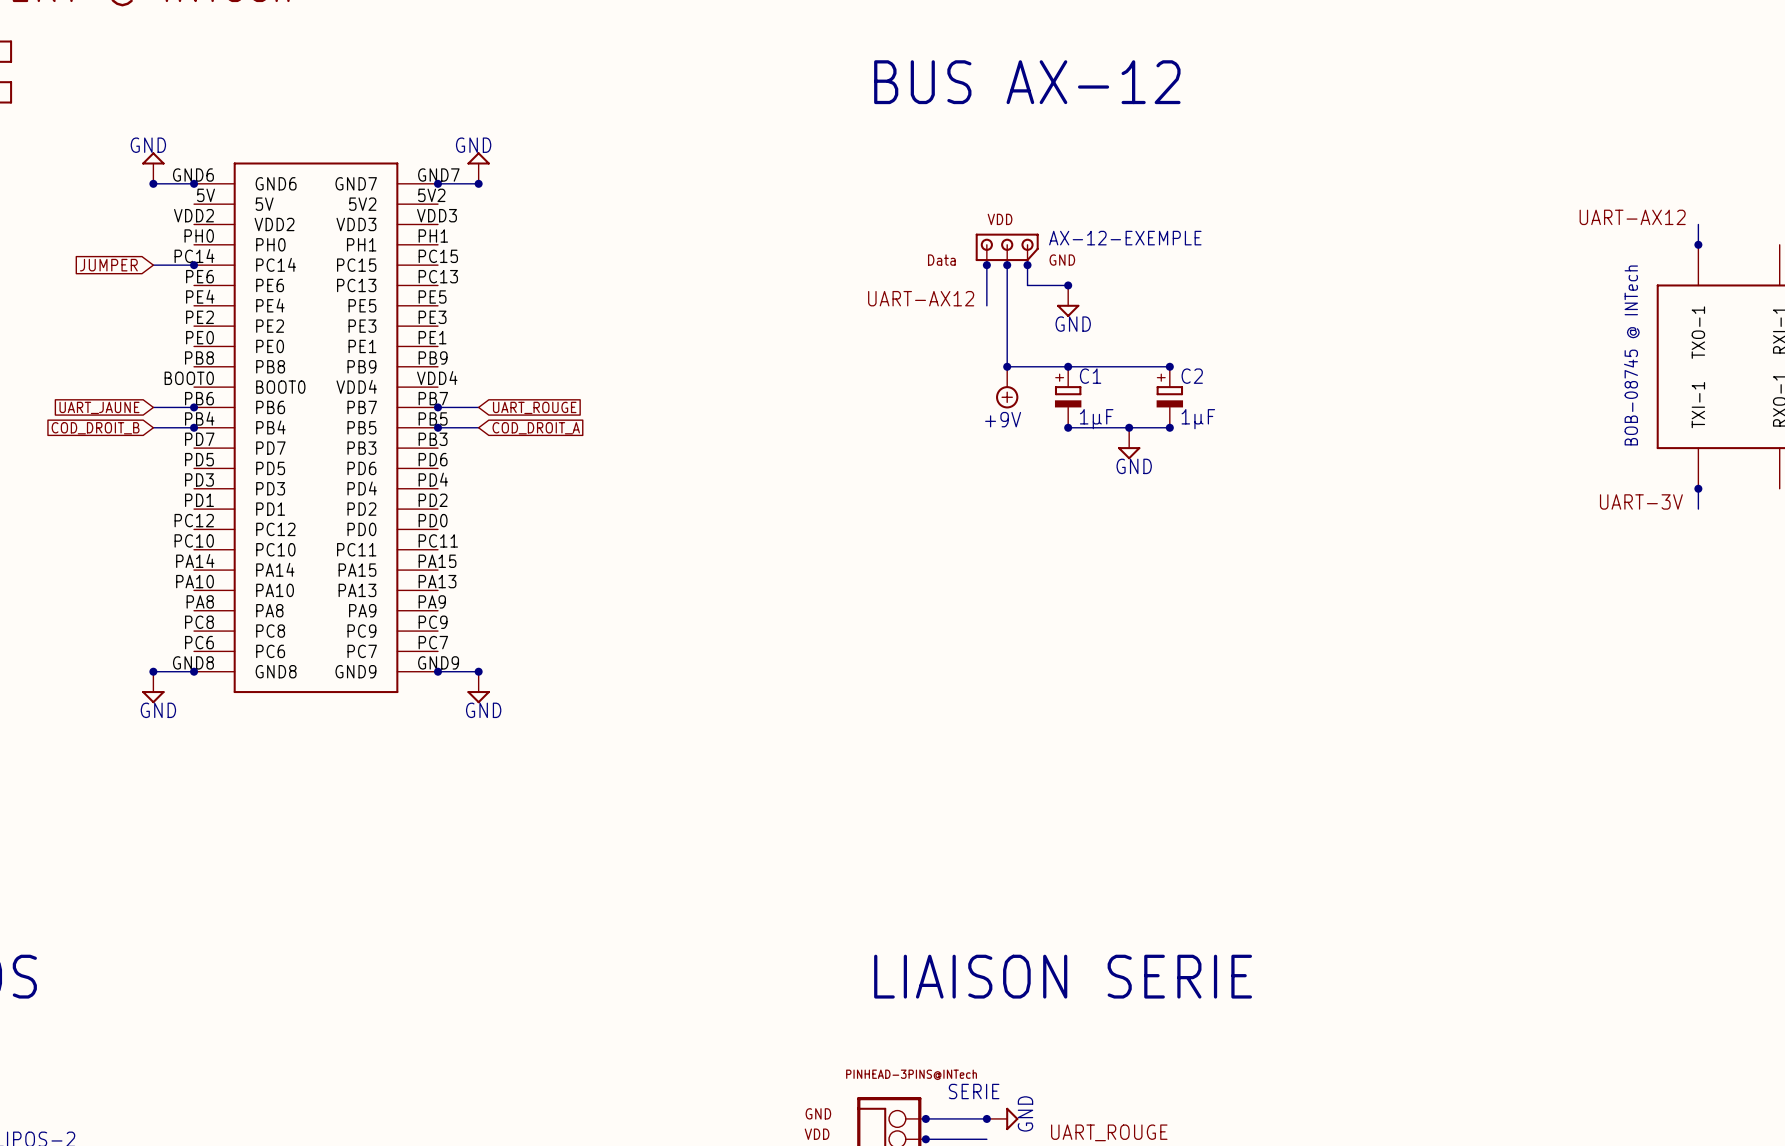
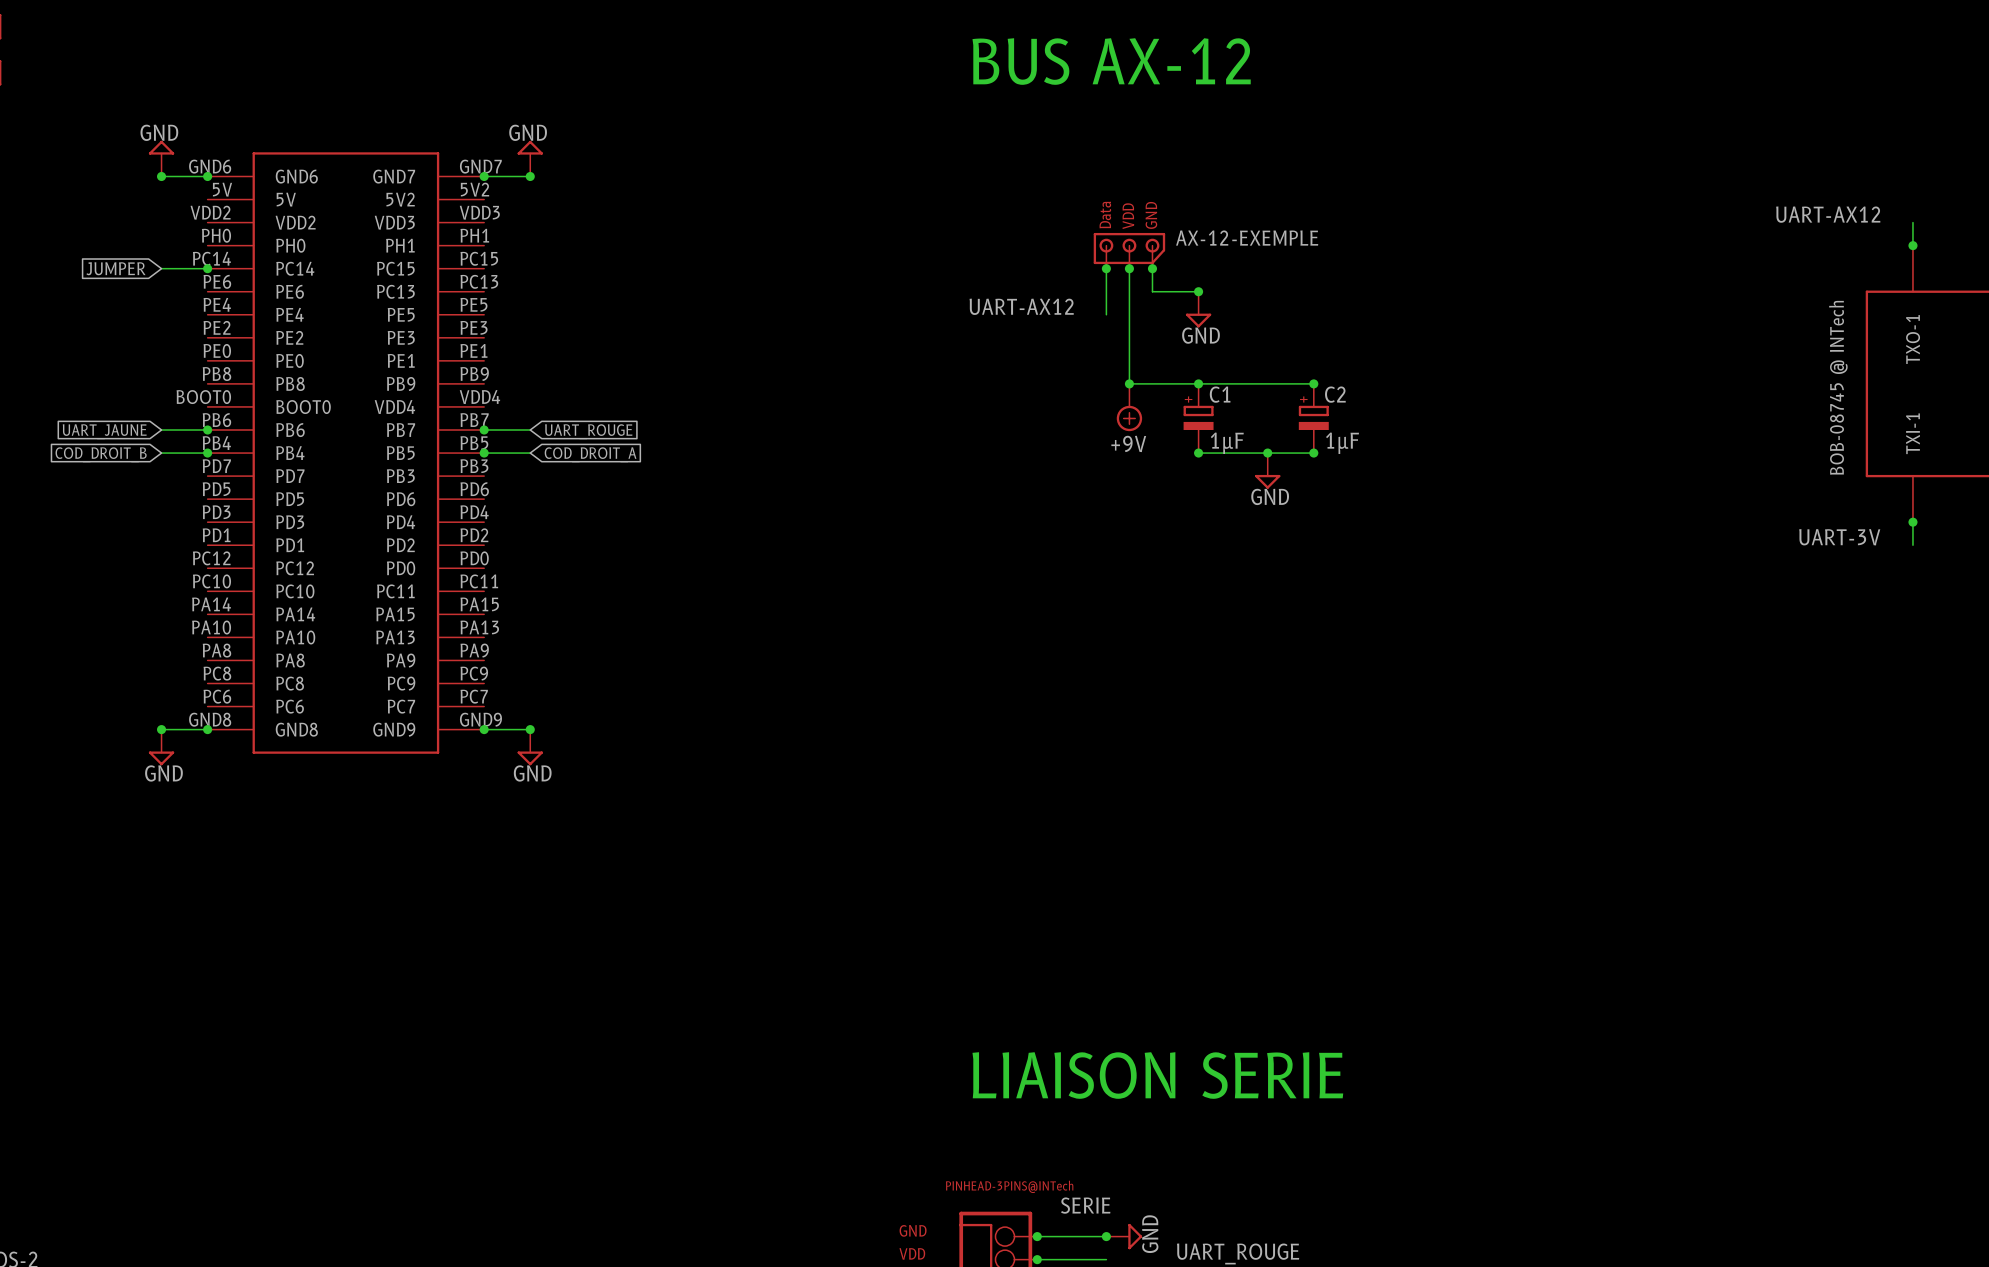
AX-12-EXEMPLE text rotation: 0° (1000, 219) -> 90° counterclockwise (1128, 216)
AX-12-EXEMPLE text rotation: 0° (941, 260) -> 90° counterclockwise (1105, 215)
AX-12-EXEMPLE text position: Data (941, 260) -> Data (1105, 215)
AX-12-EXEMPLE text rotation: 0° (1062, 260) -> 90° counterclockwise (1151, 215)
AX-12-EXEMPLE text position: GND (1062, 260) -> GND (1151, 215)

